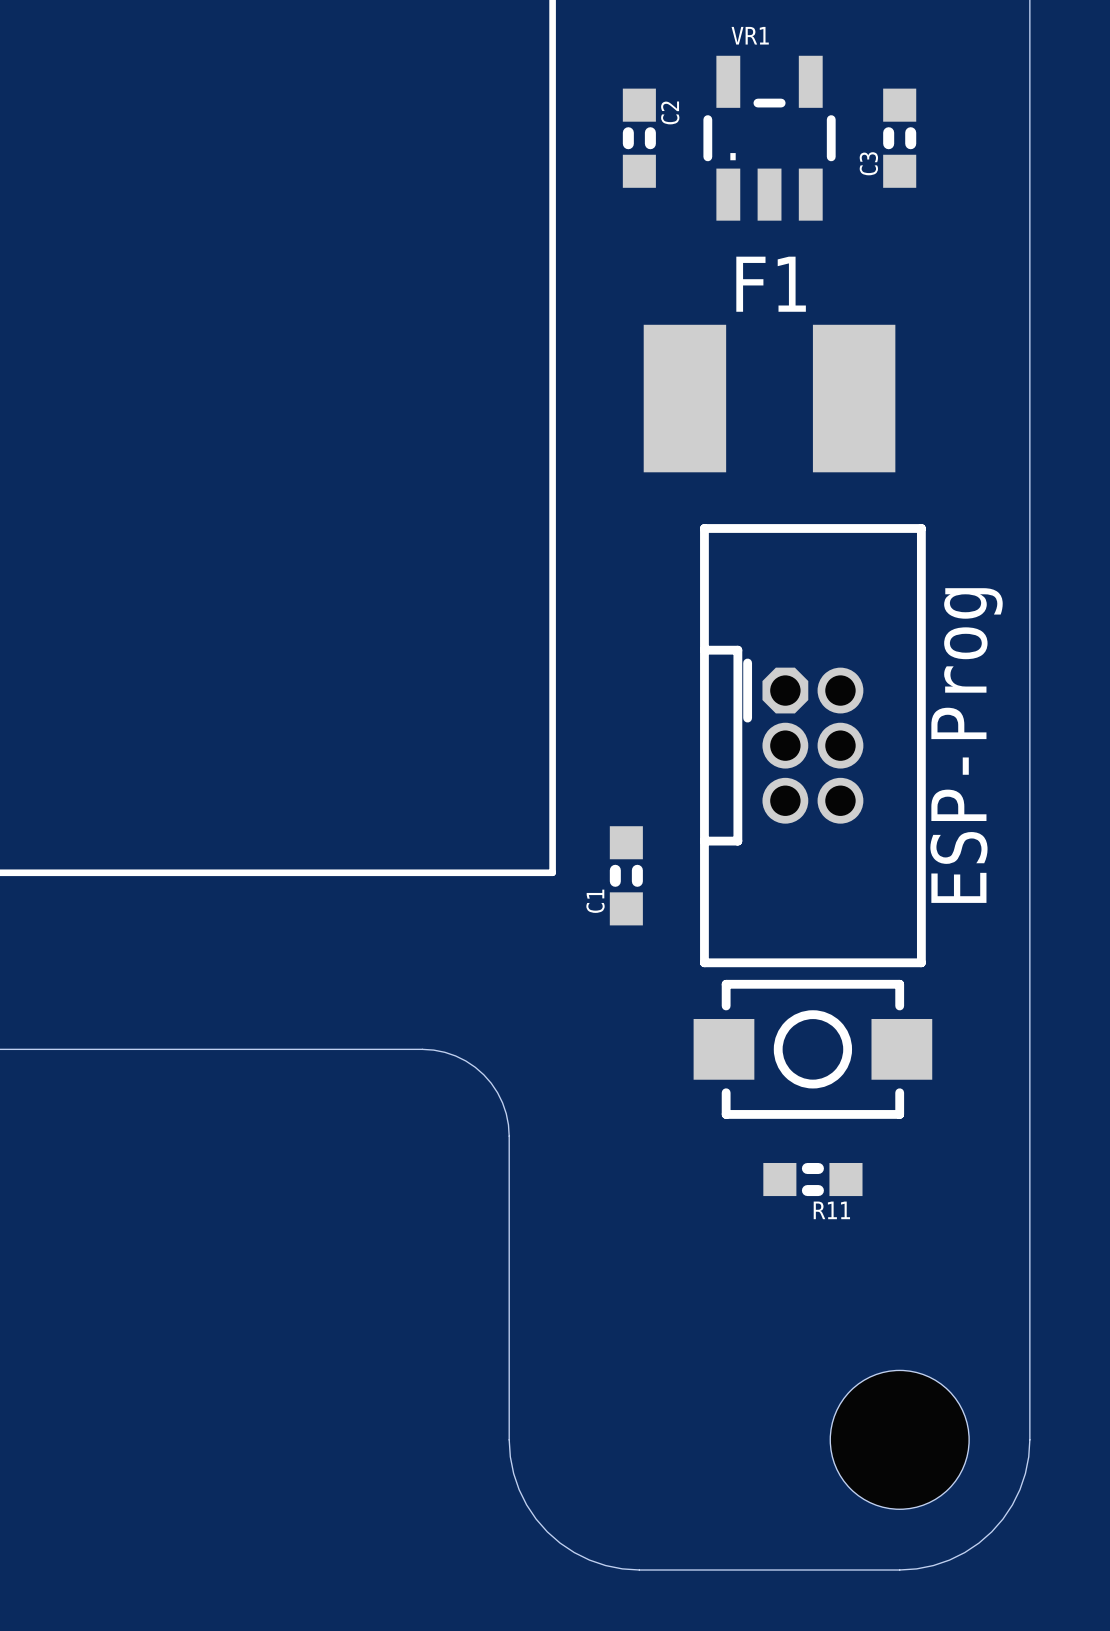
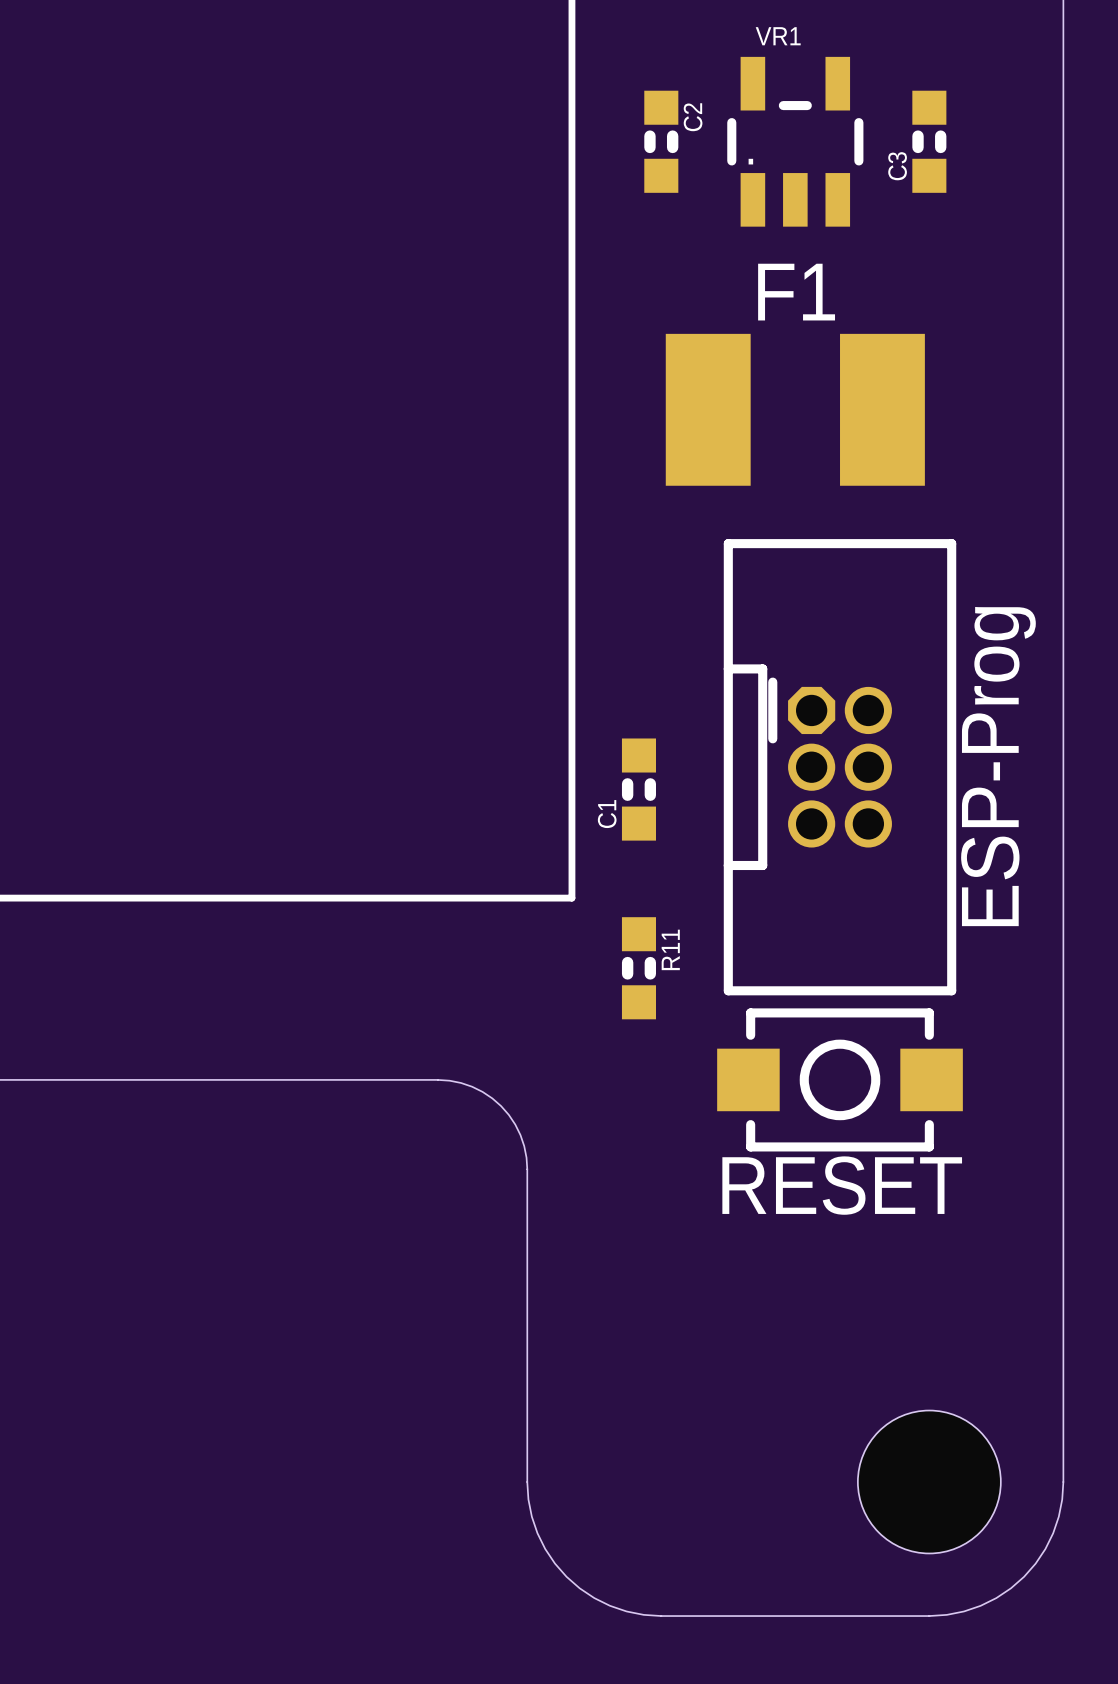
C1 position: (626, 875) -> (638, 789)
text: none -> RESET (842, 1185)
R11 rotation: 0° (812, 1179) -> 90° clockwise (638, 968)
R11 position: (812, 1179) -> (638, 968)

